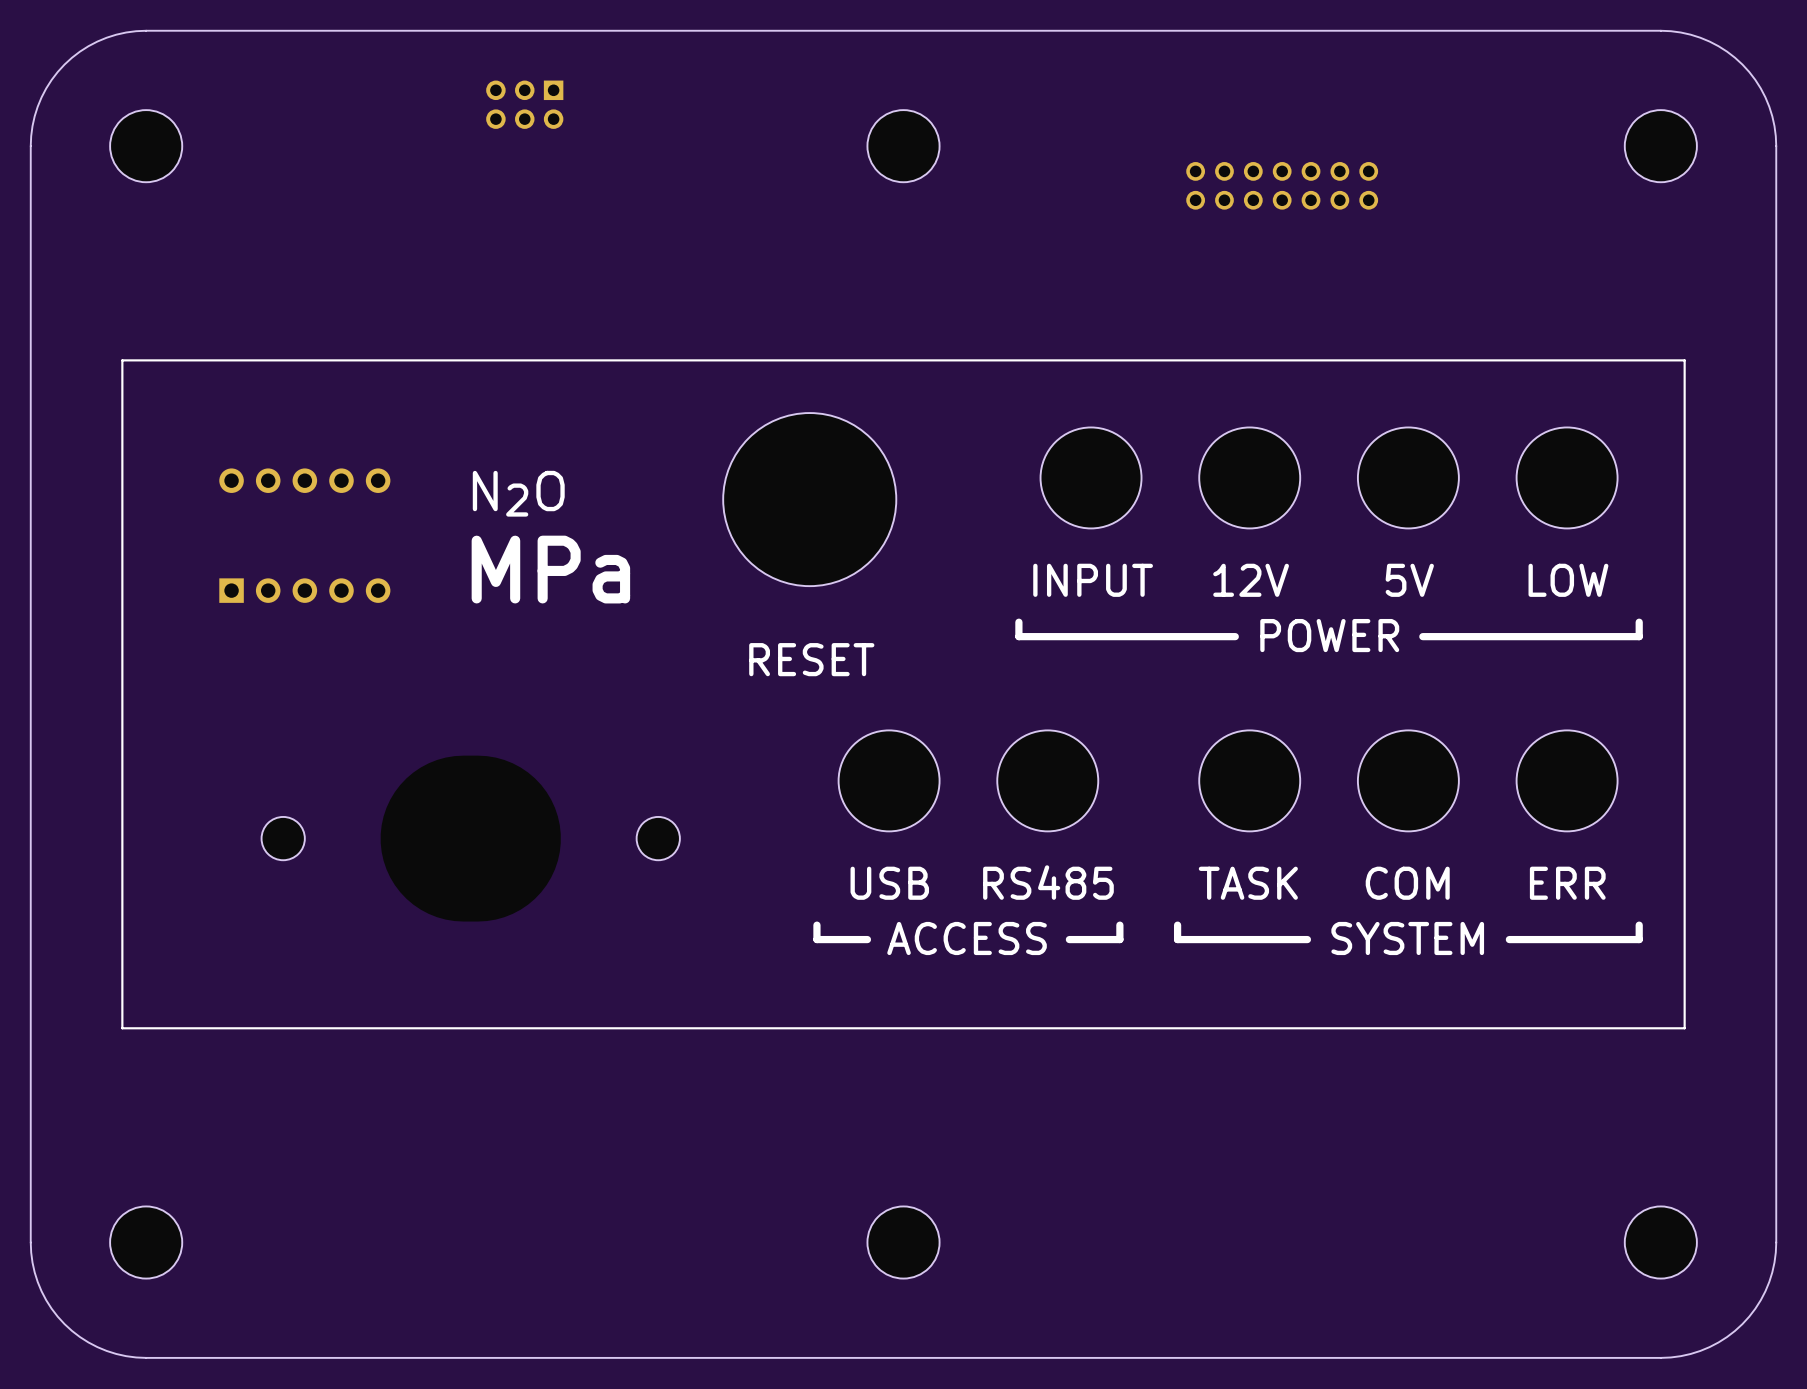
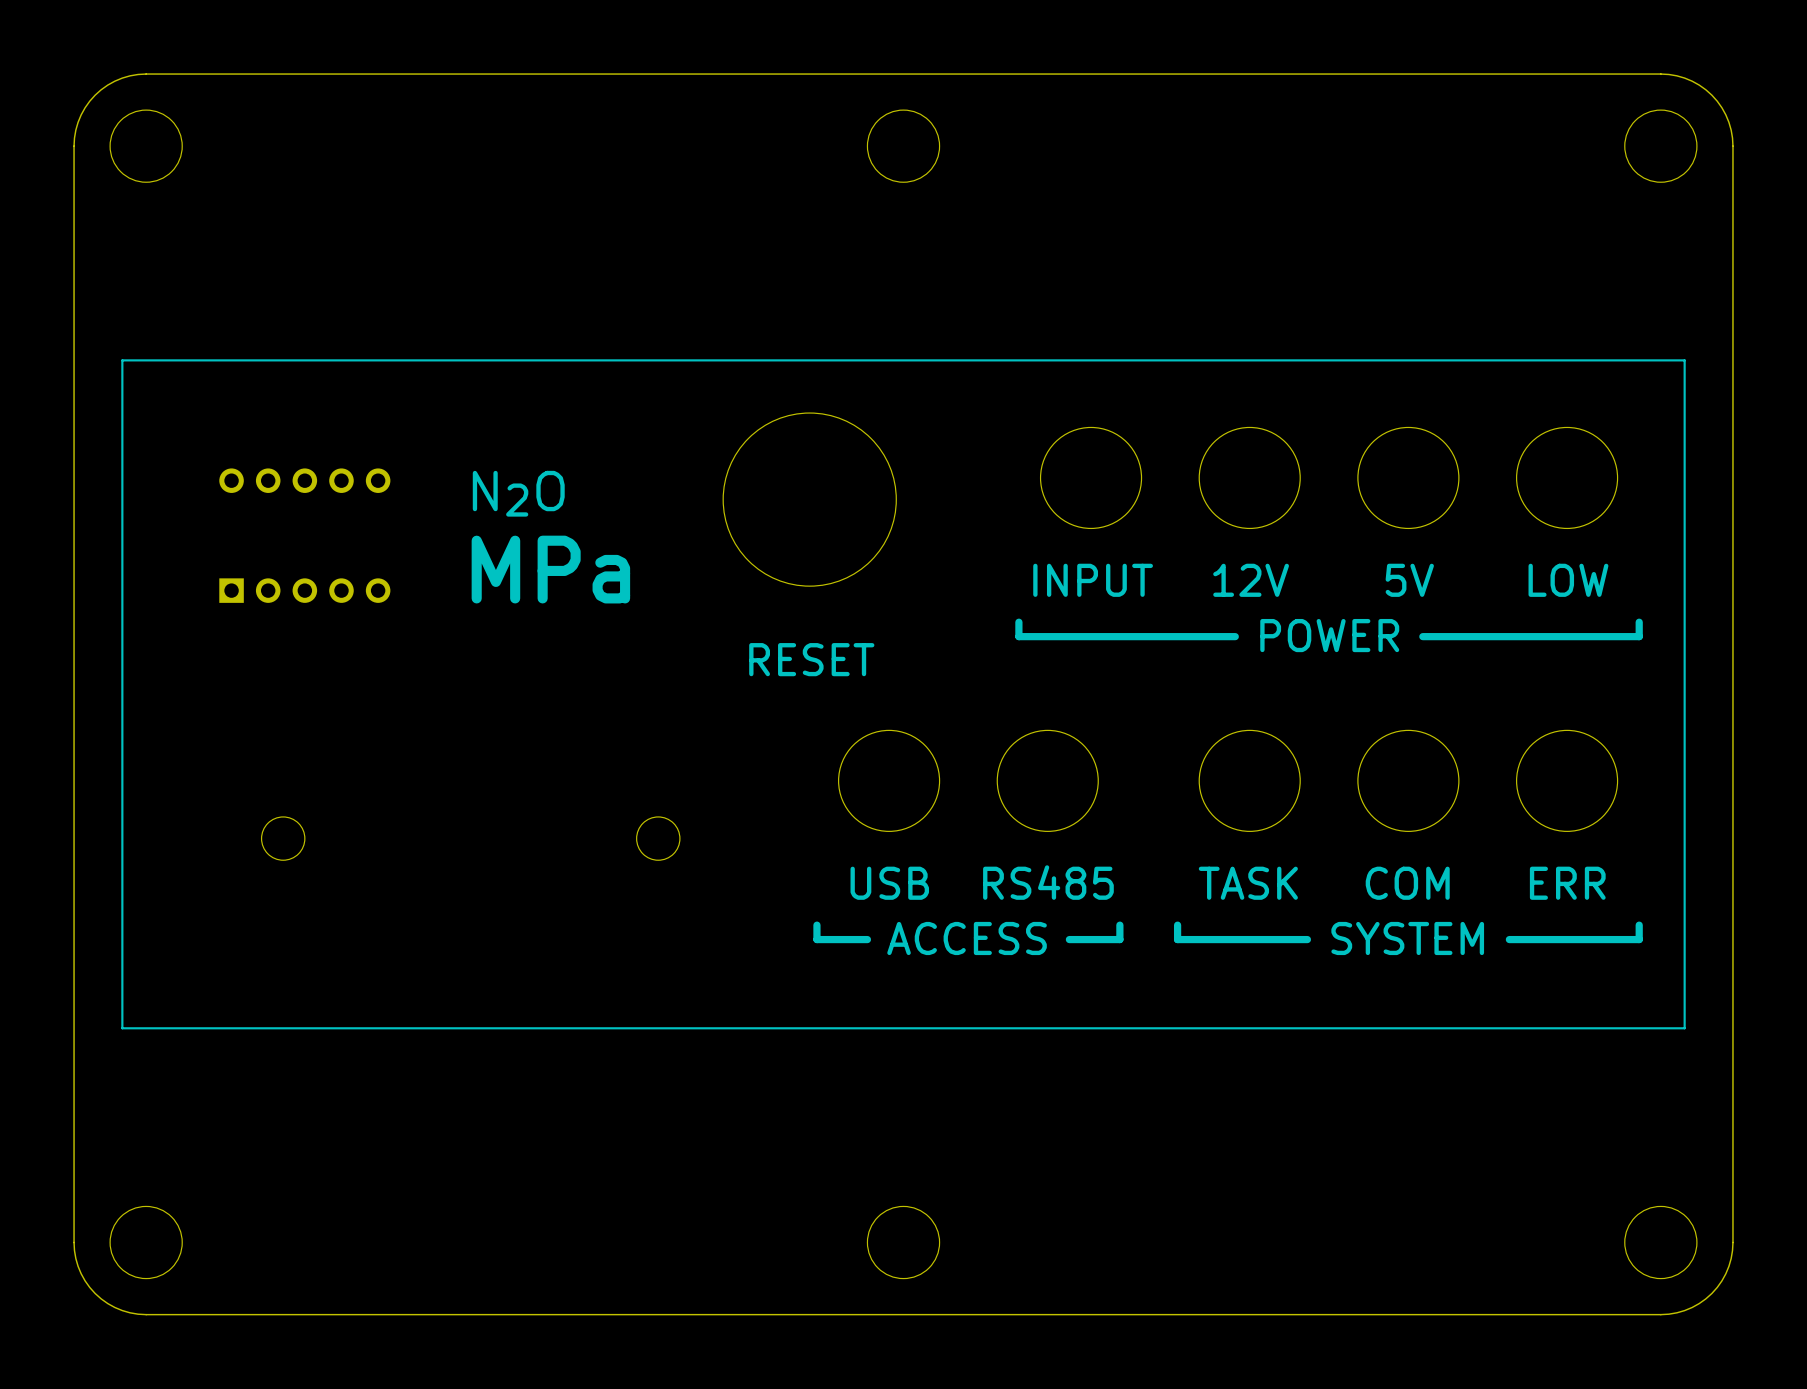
board edge: (146, 30) (1660, 30) (1680, 32) (1700, 37) (1718, 46) (1735, 57) (1749, 71) (1765, 97) (1772, 116) (1776, 146) (1776, 1242) (1774, 1262) (1769, 1281) (1760, 1300) (1749, 1316) (1735, 1330) (1709, 1347) (1690, 1353) (1660, 1357) (146, 1357) (126, 1356) (106, 1350) (88, 1342) (71, 1330) (51, 1308) (41, 1291) (32, 1262) (30, 1242) (31, 136) (34, 116) (41, 97) (51, 79) (64, 64) (79, 51) (97, 41) (116, 34) (146, 30) -> (146, 74) (130, 75) (114, 81) (95, 95) (85, 107) (78, 122) (74, 146) (74, 1242) (75, 1258) (81, 1273) (89, 1287) (101, 1298) (122, 1310) (146, 1314) (1660, 1314) (1676, 1312) (1692, 1307) (1705, 1298) (1717, 1287) (1728, 1266) (1732, 1242) (1732, 146) (1731, 130) (1725, 114) (1717, 101) (1705, 89) (1684, 78) (1660, 74) (146, 74)
part: (524, 104) -> none
part: (1282, 185) -> none

